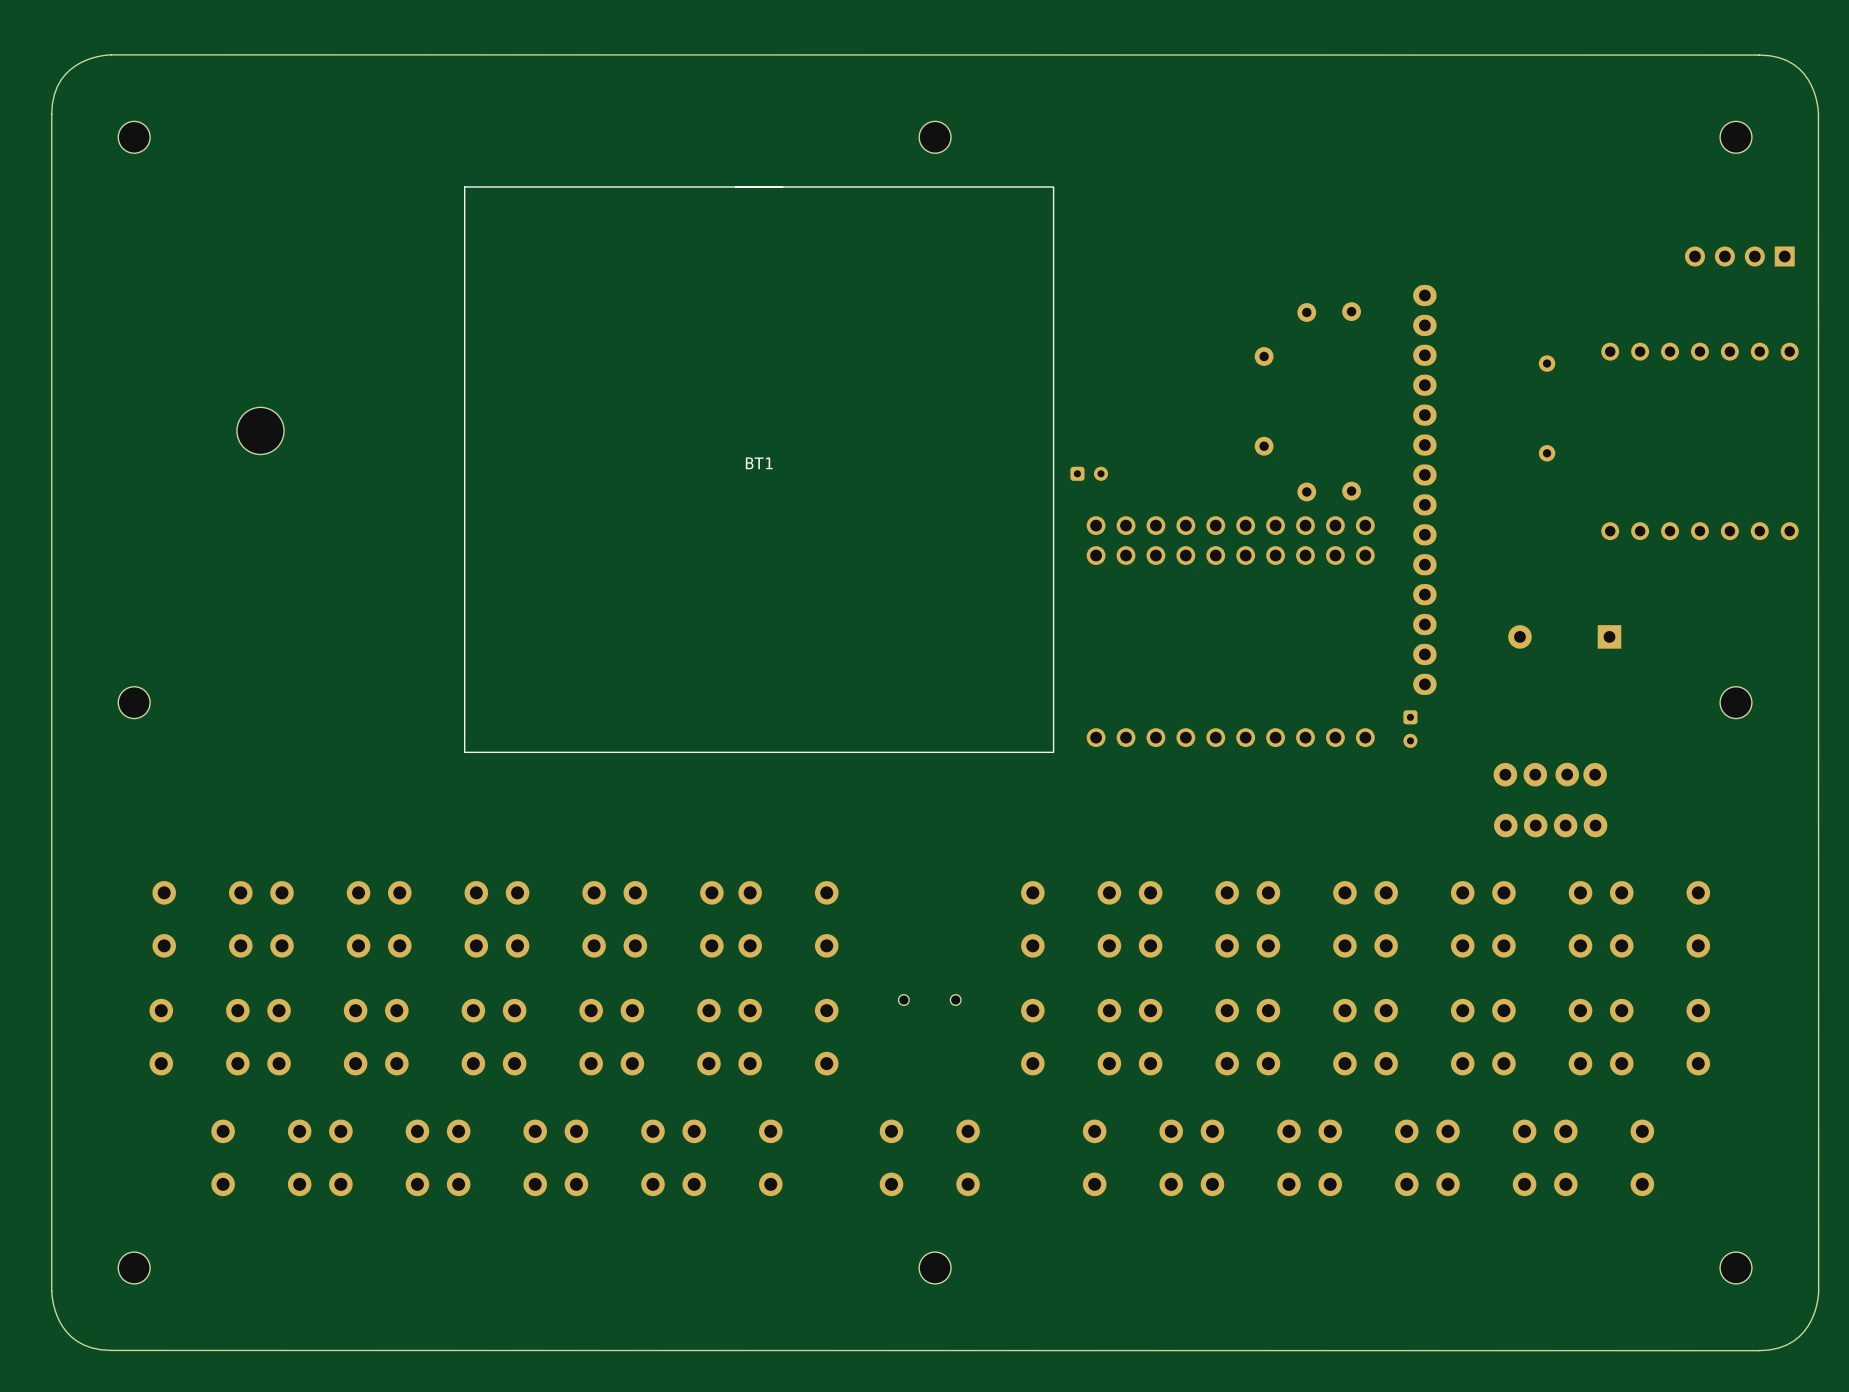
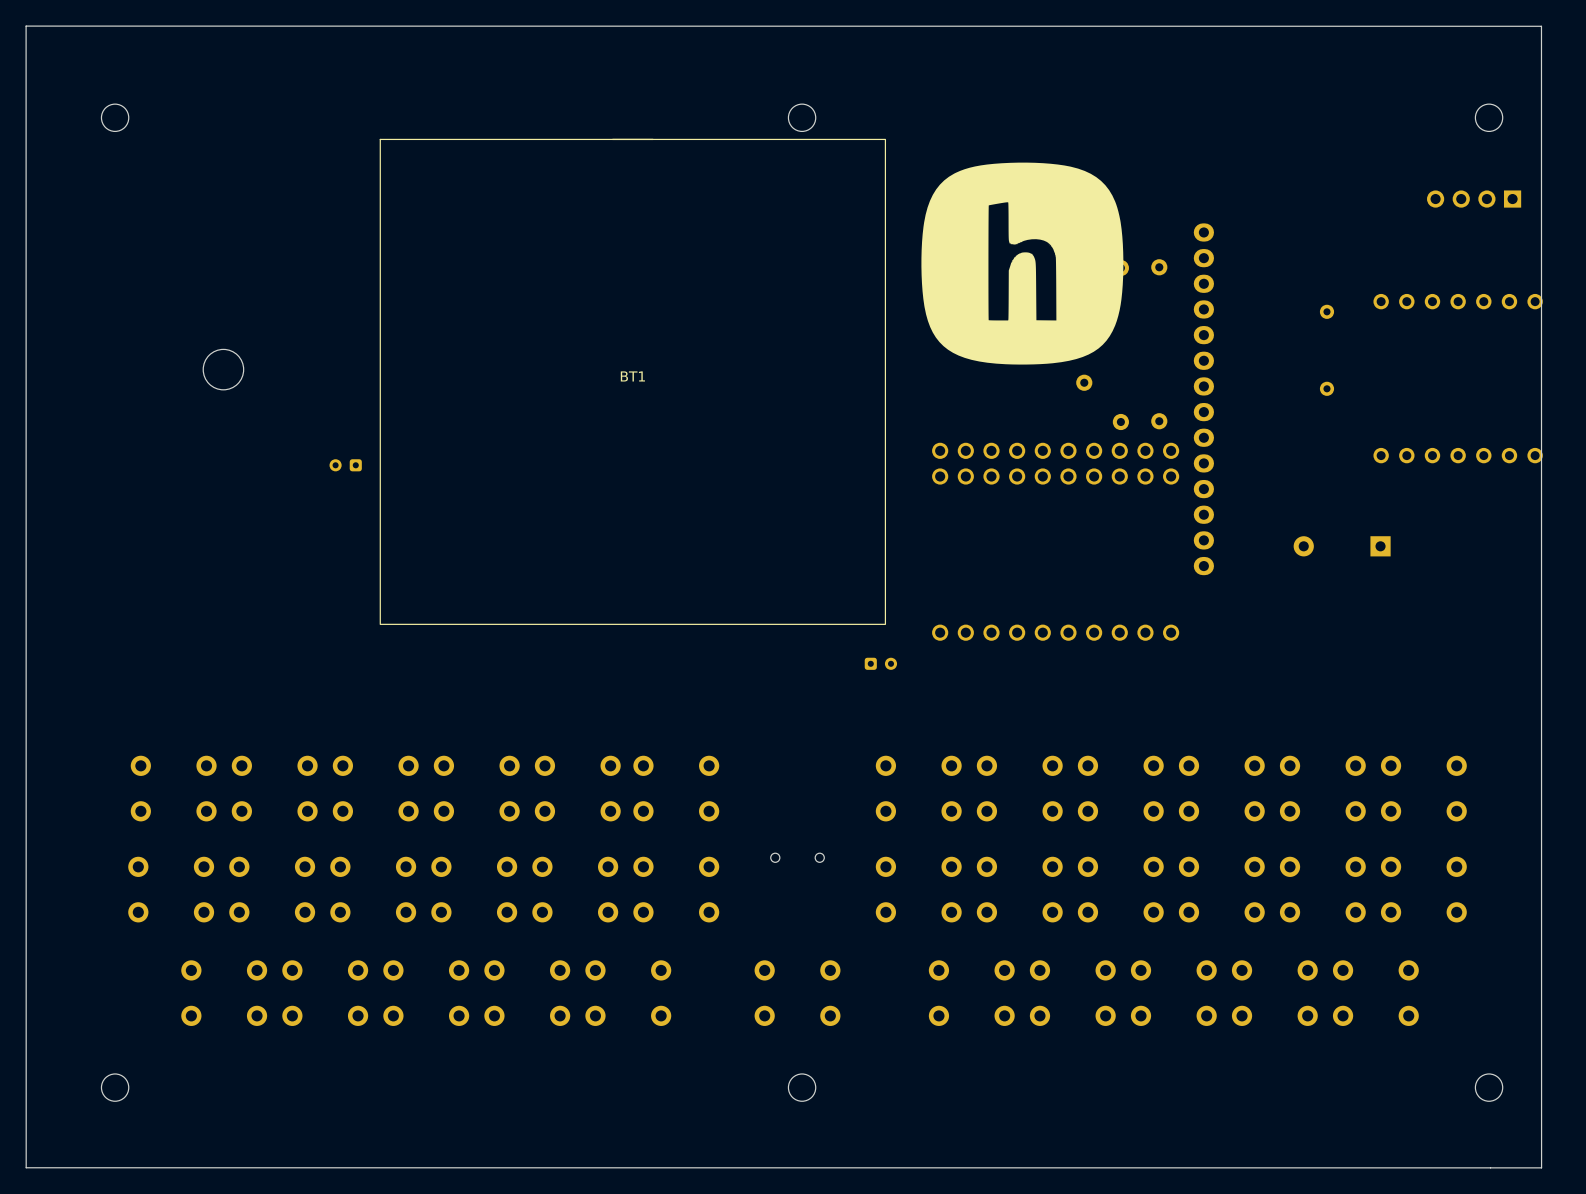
board edge: (111, 54) (1759, 55) (1778, 57) (1793, 64) (1803, 73) (1811, 84) (1816, 100) (1818, 114) (1818, 1291) (1813, 1315) (1804, 1331) (1786, 1345) (1759, 1350) (111, 1350) (91, 1347) (76, 1341) (66, 1331) (59, 1320) (53, 1304) (51, 1290) (51, 114) (54, 94) (65, 74) (75, 65) (87, 59) (111, 54) -> (26, 26) (1541, 26) (1541, 1167) (26, 1167) (26, 26)
drawing: none -> [921, 162, 1124, 365]
part position: (1739, 256) -> (1474, 199)
BT1 position: (759, 469) -> (632, 381)
part: (1089, 473) -> none
part position: (1424, 489) -> (1203, 399)
part: none -> (345, 465)
part: (134, 702) -> none
part: (1736, 702) -> none
part: (1410, 729) -> none
part: none -> (880, 663)
part: (1550, 800) -> none

